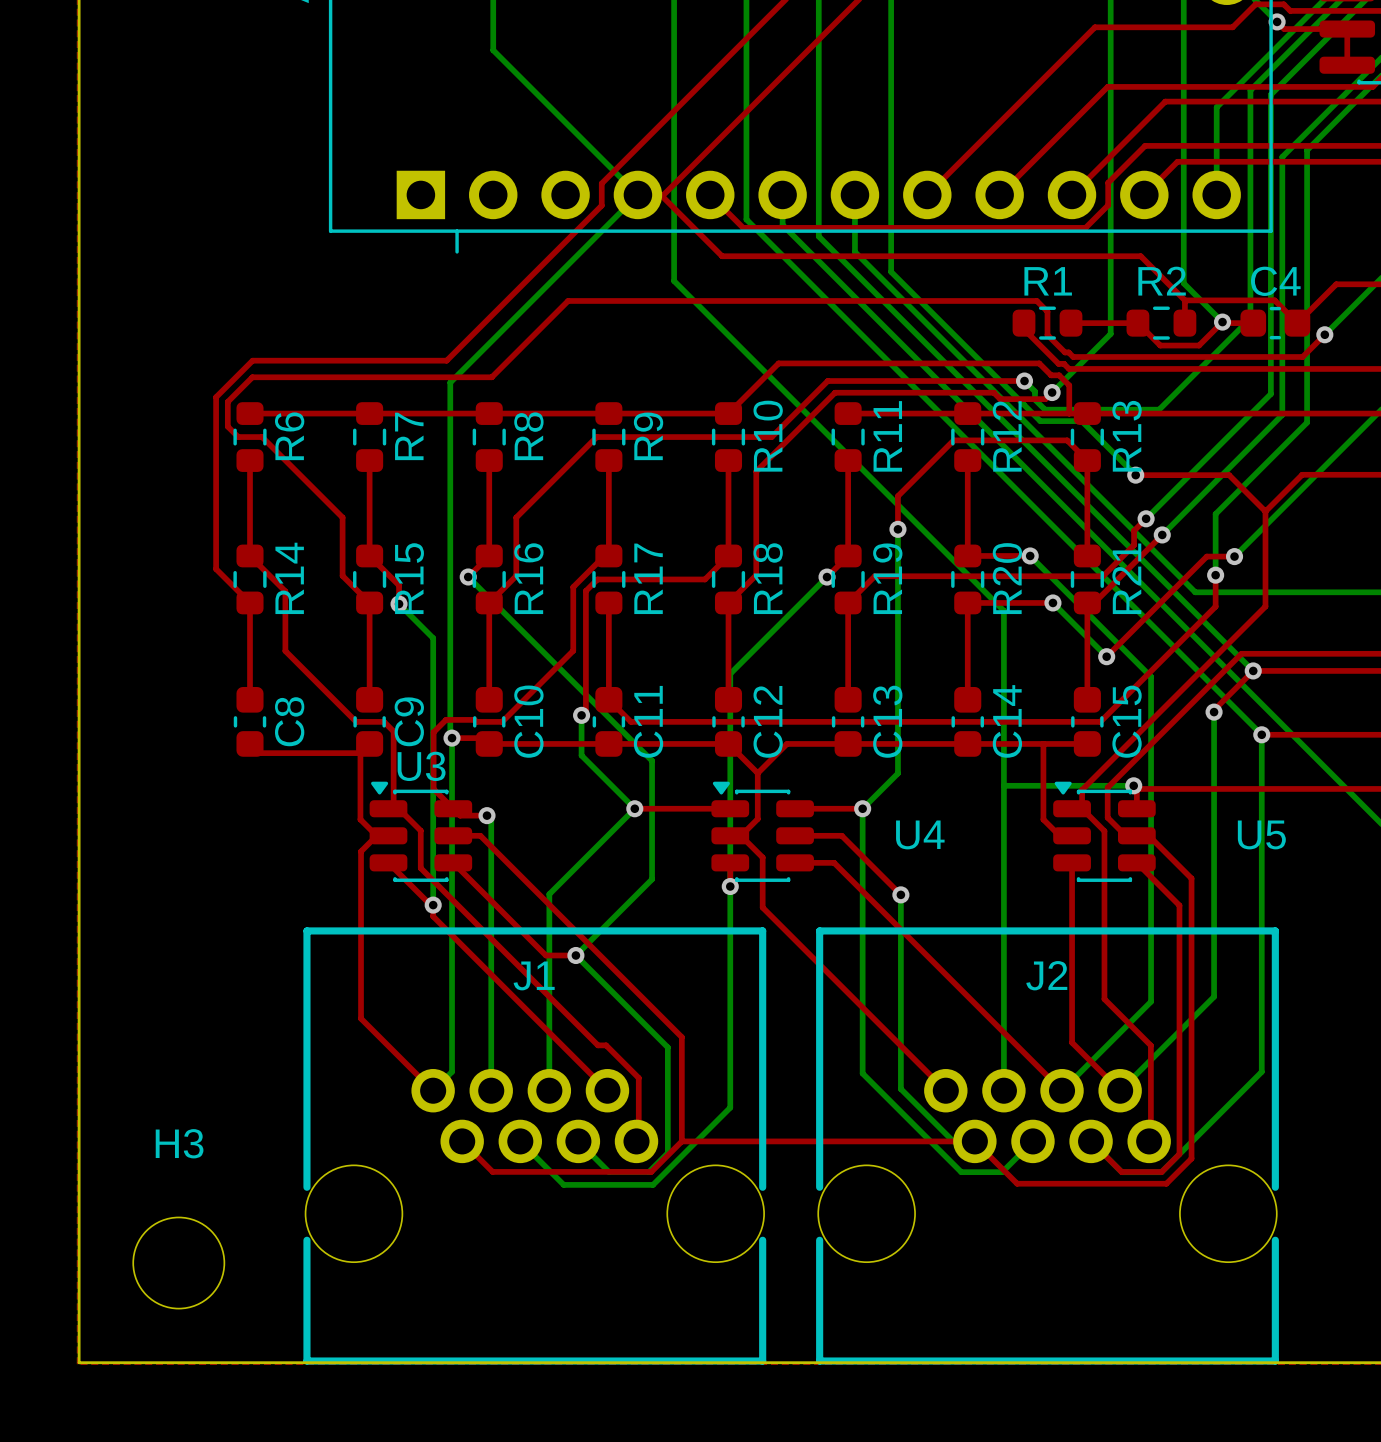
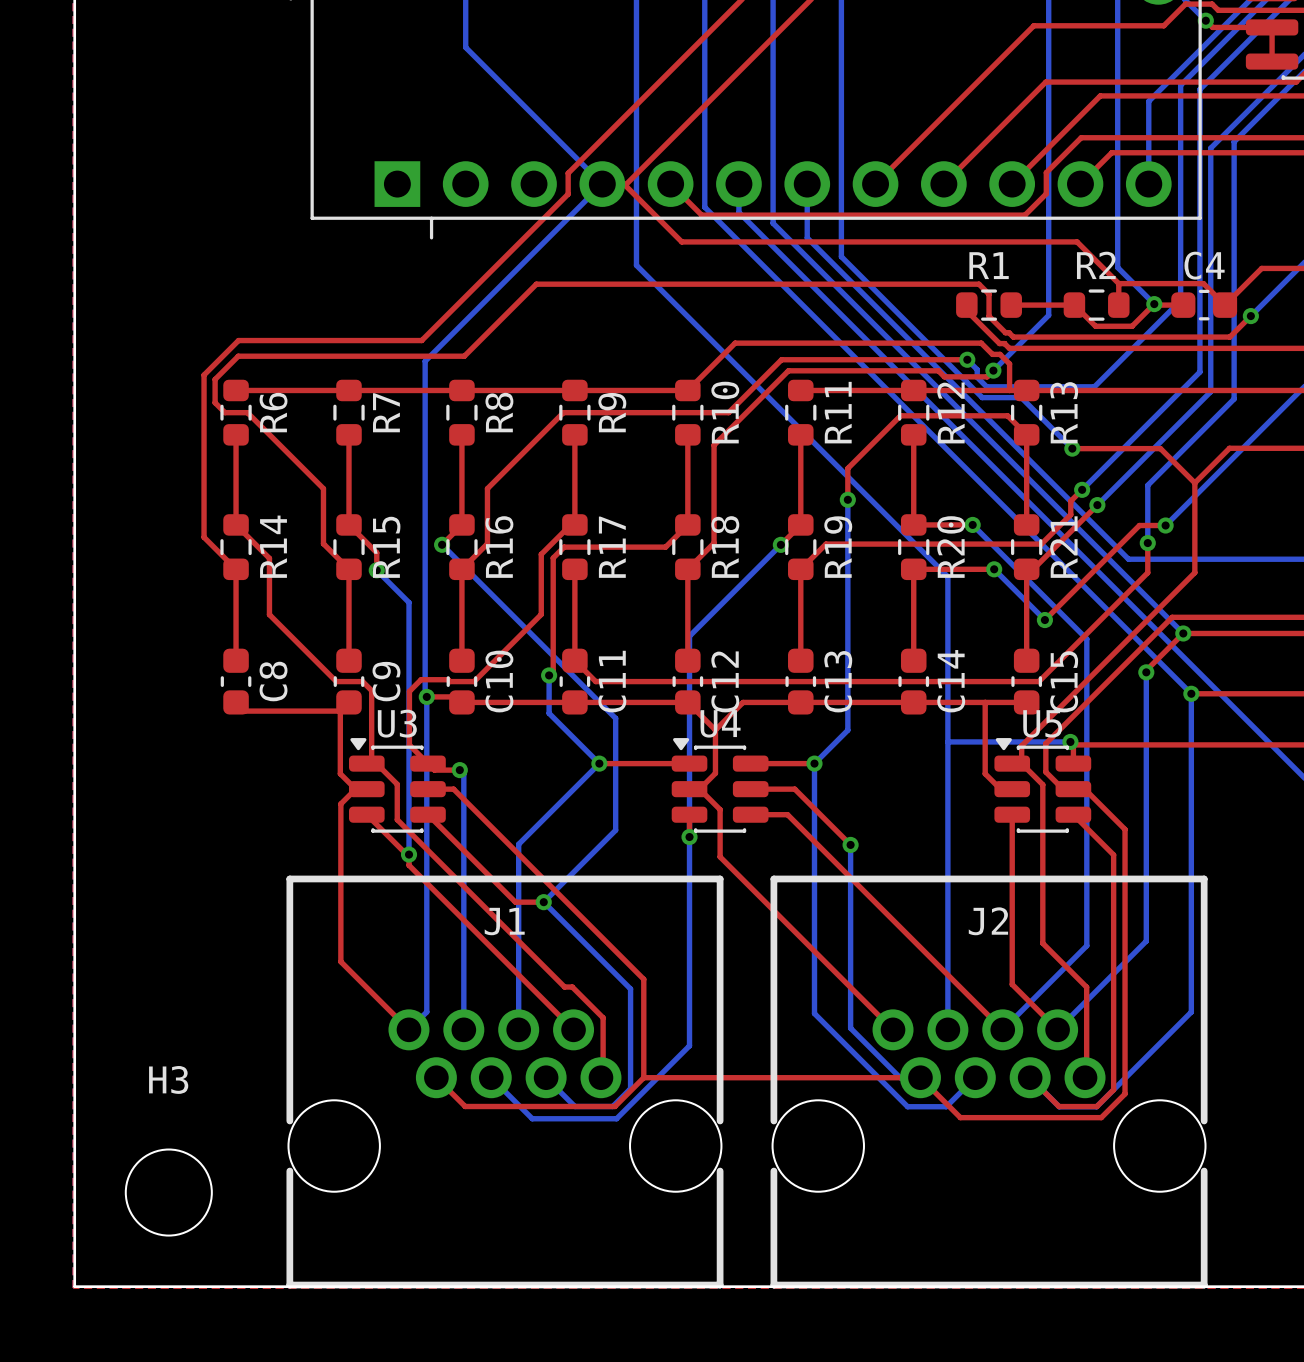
U4 name position: U4 (920, 834) -> U4 (720, 723)
U5 name position: U5 (1261, 834) -> U5 (1042, 723)

